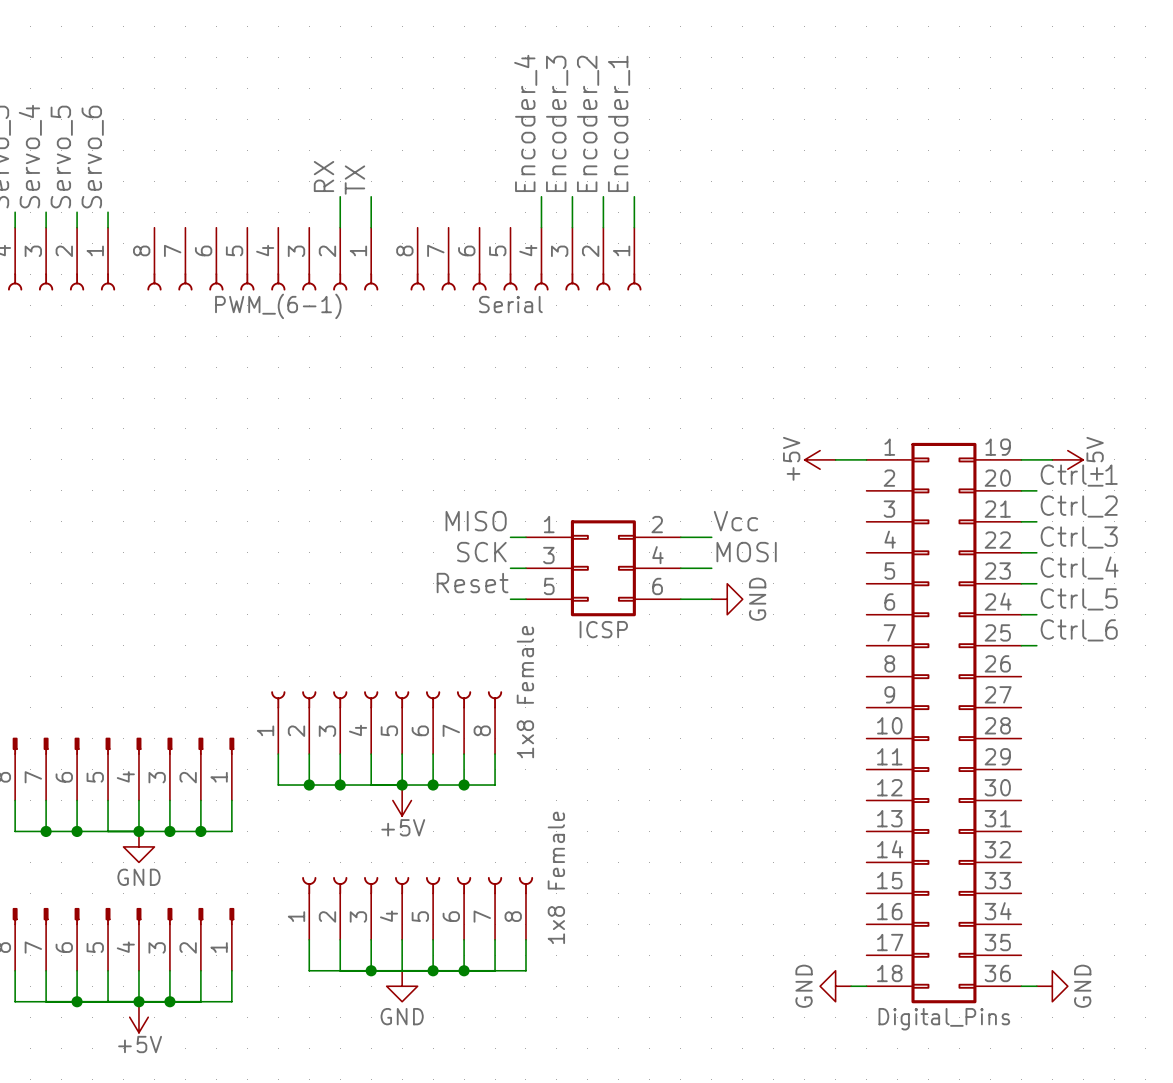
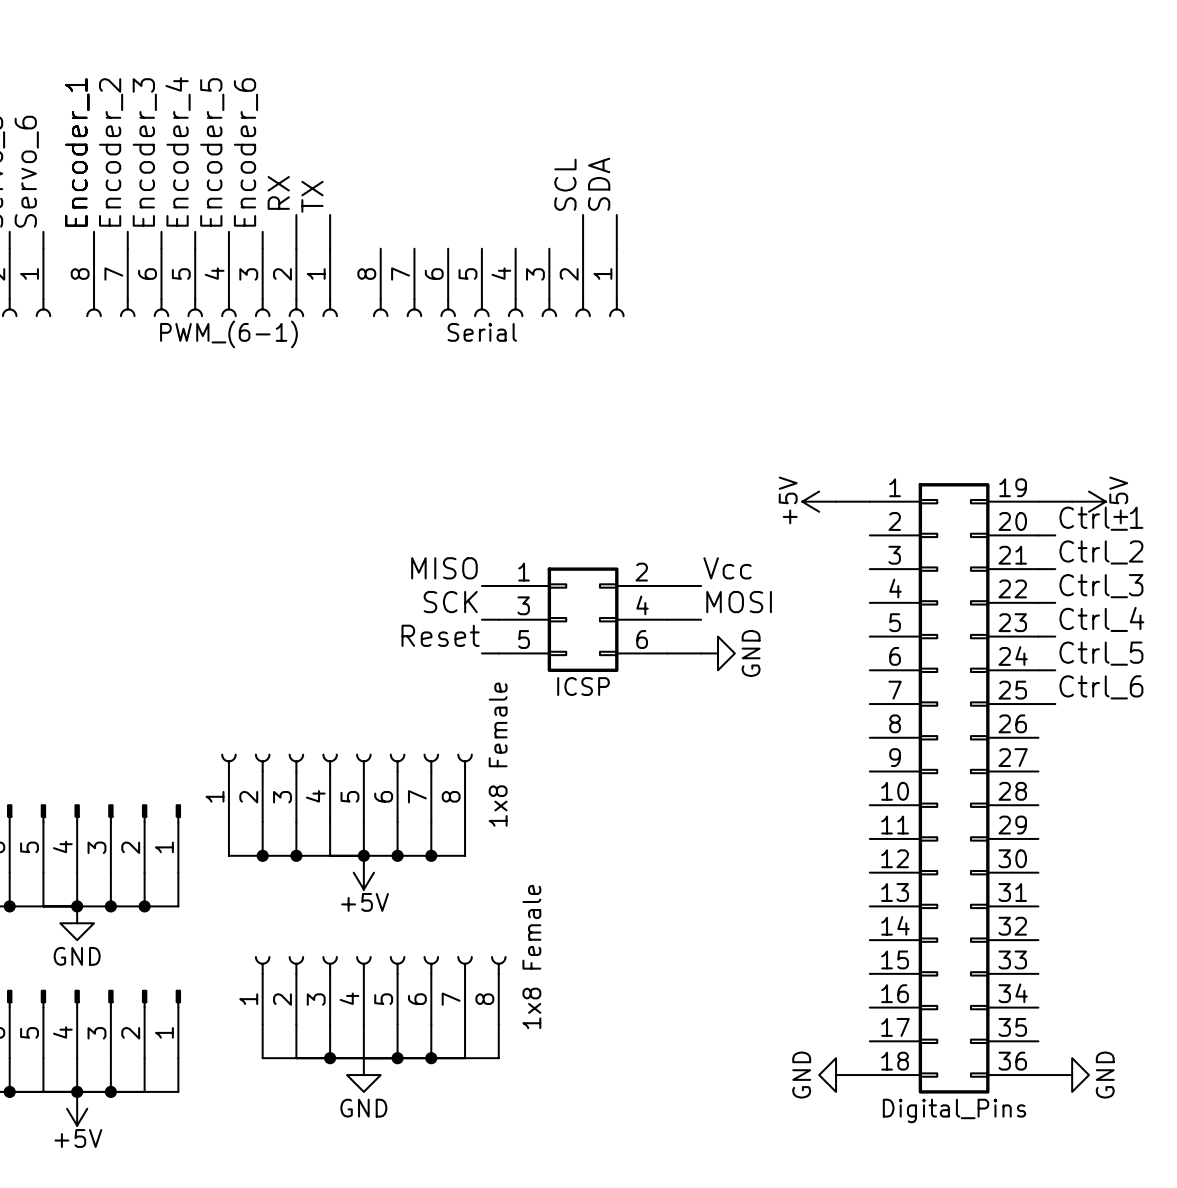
label position: Encoder_4 (525, 123) -> Encoder_4 (178, 151)
label: Encoder_3 (557, 123) -> none
label: Encoder_2 (588, 123) -> SCL (565, 184)
label: Encoder_1 (619, 123) -> SDA (599, 184)
label: none -> Encoder_1 (77, 152)
label: none -> Encoder_2 (111, 152)
label: none -> Encoder_3 (144, 152)
label: none -> Encoder_5 (212, 152)
label: none -> Encoder_6 (245, 152)
wire: (541, 196) (541, 227) -> none
wire: (572, 196) (572, 227) -> none
wire: none -> (94, 231) (94, 248)
wire: none -> (127, 231) (127, 248)
wire: none -> (161, 231) (161, 248)
wire: none -> (195, 231) (195, 248)
wire: none -> (228, 231) (228, 248)
wire: none -> (262, 231) (262, 248)

